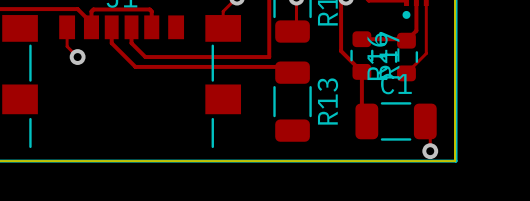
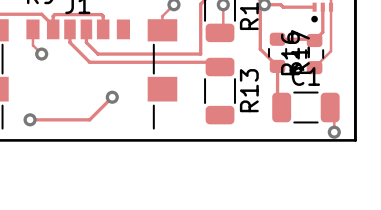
track: none -> (112, 97) (89, 119) (30, 119)
via: none -> (112, 97)
via: none -> (30, 119)

